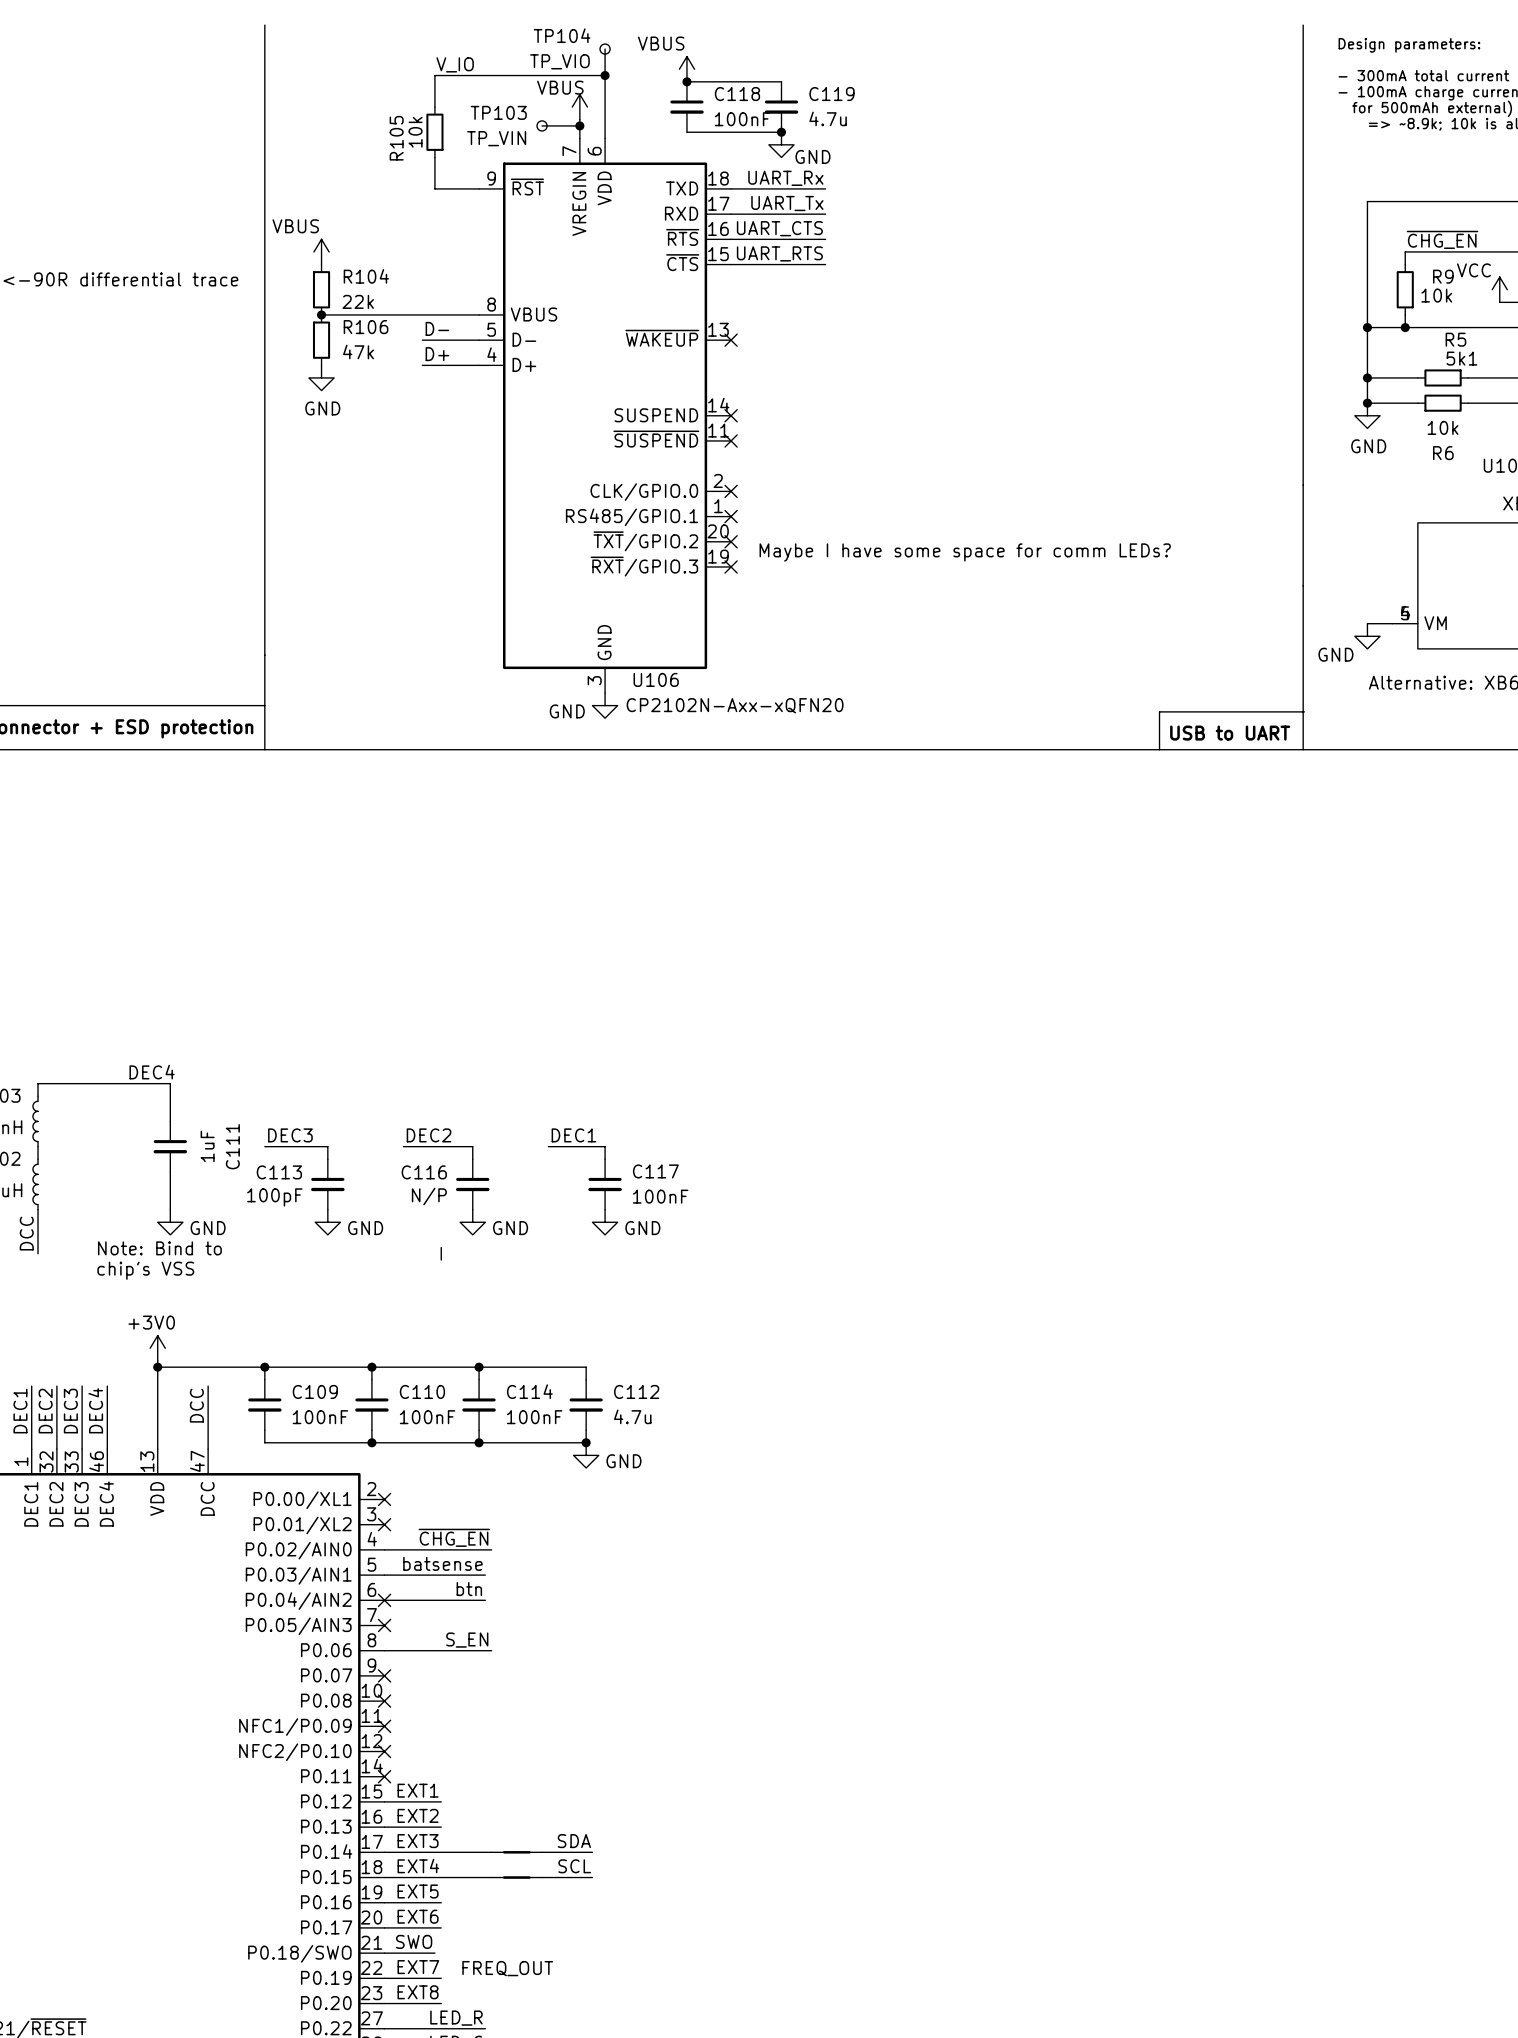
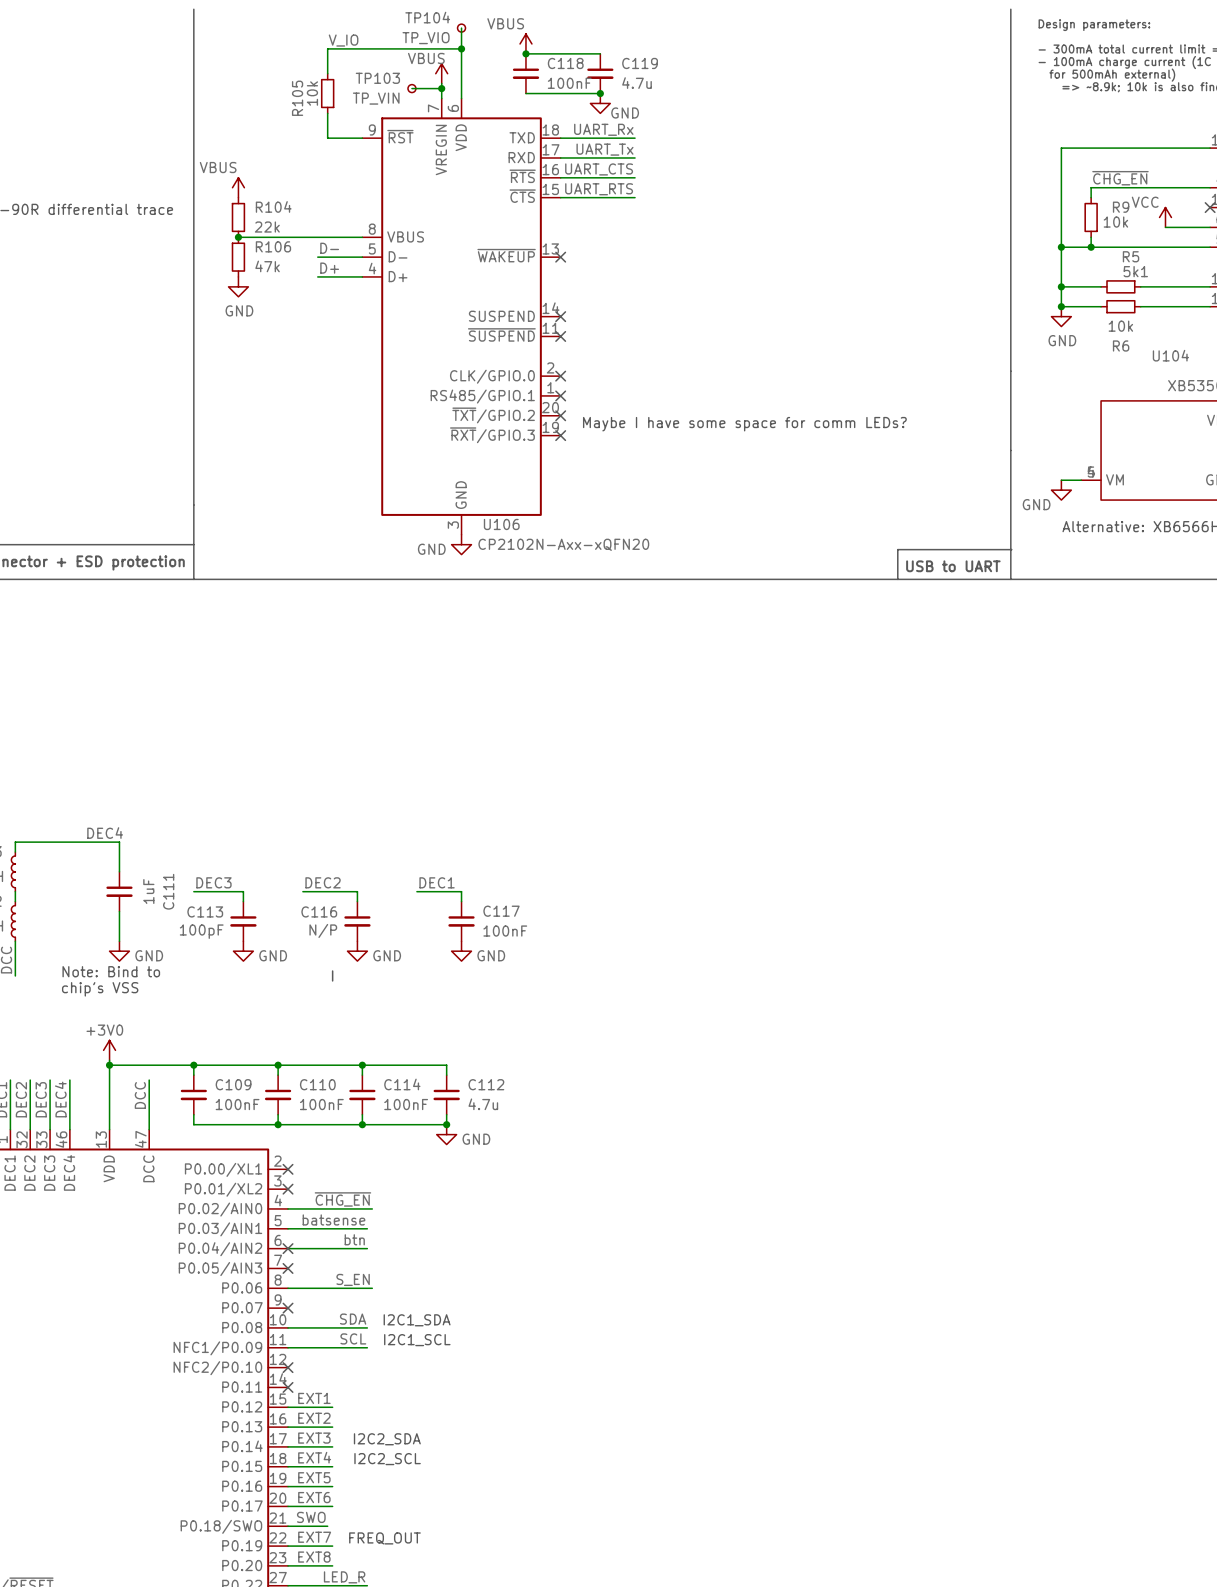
text: none -> I2C1_SDA (417, 1320)
wire: none -> (288, 1327) (367, 1327)
no-connect mark: (384, 1701) -> none
text: none -> I2C1_SCL (417, 1340)
wire: none -> (288, 1347) (367, 1347)
no-connect mark: (384, 1726) -> none
label position: SDA (574, 1841) -> SDA (353, 1319)
text: none -> I2C2_SDA (387, 1439)
wire: (441, 1852) (491, 1852) -> none
part: (516, 1852) -> none
wire: (542, 1852) (592, 1852) -> none
label position: SCL (574, 1866) -> SCL (353, 1338)
text: none -> I2C2_SCL (387, 1459)
wire: (441, 1877) (491, 1877) -> none
part: (516, 1877) -> none
wire: (542, 1877) (592, 1877) -> none

